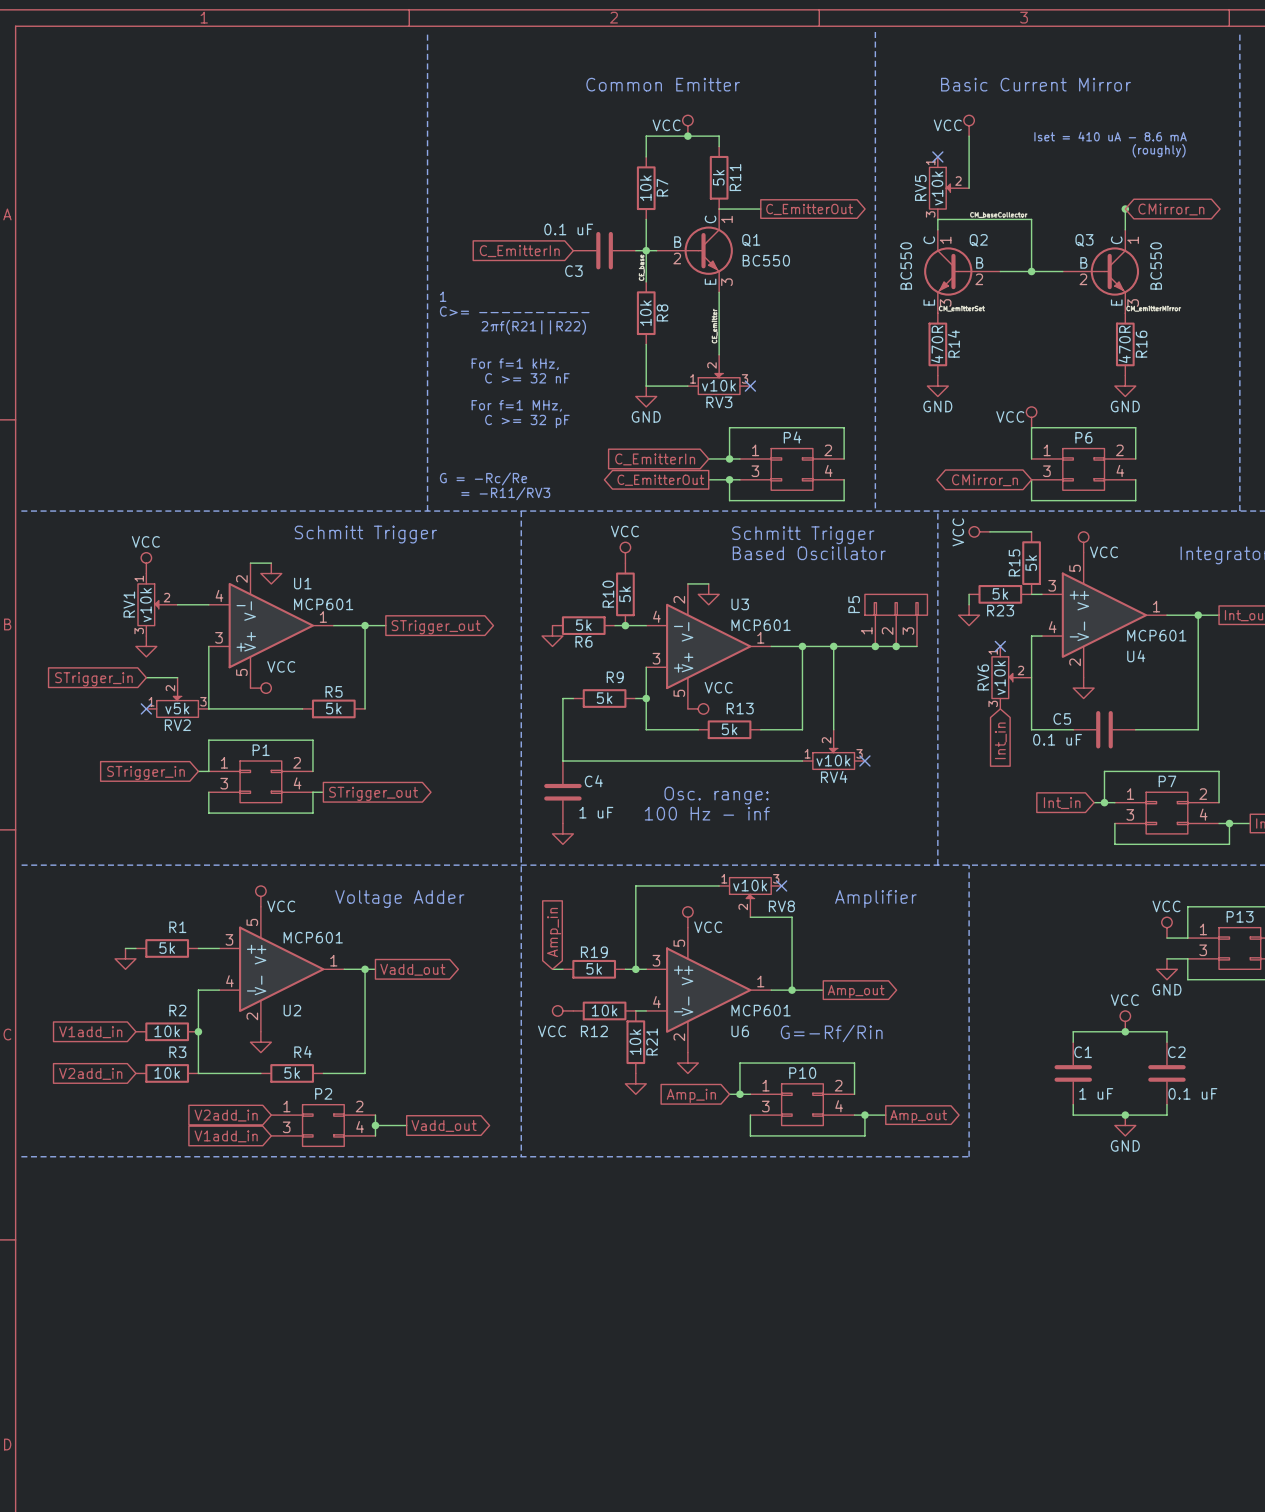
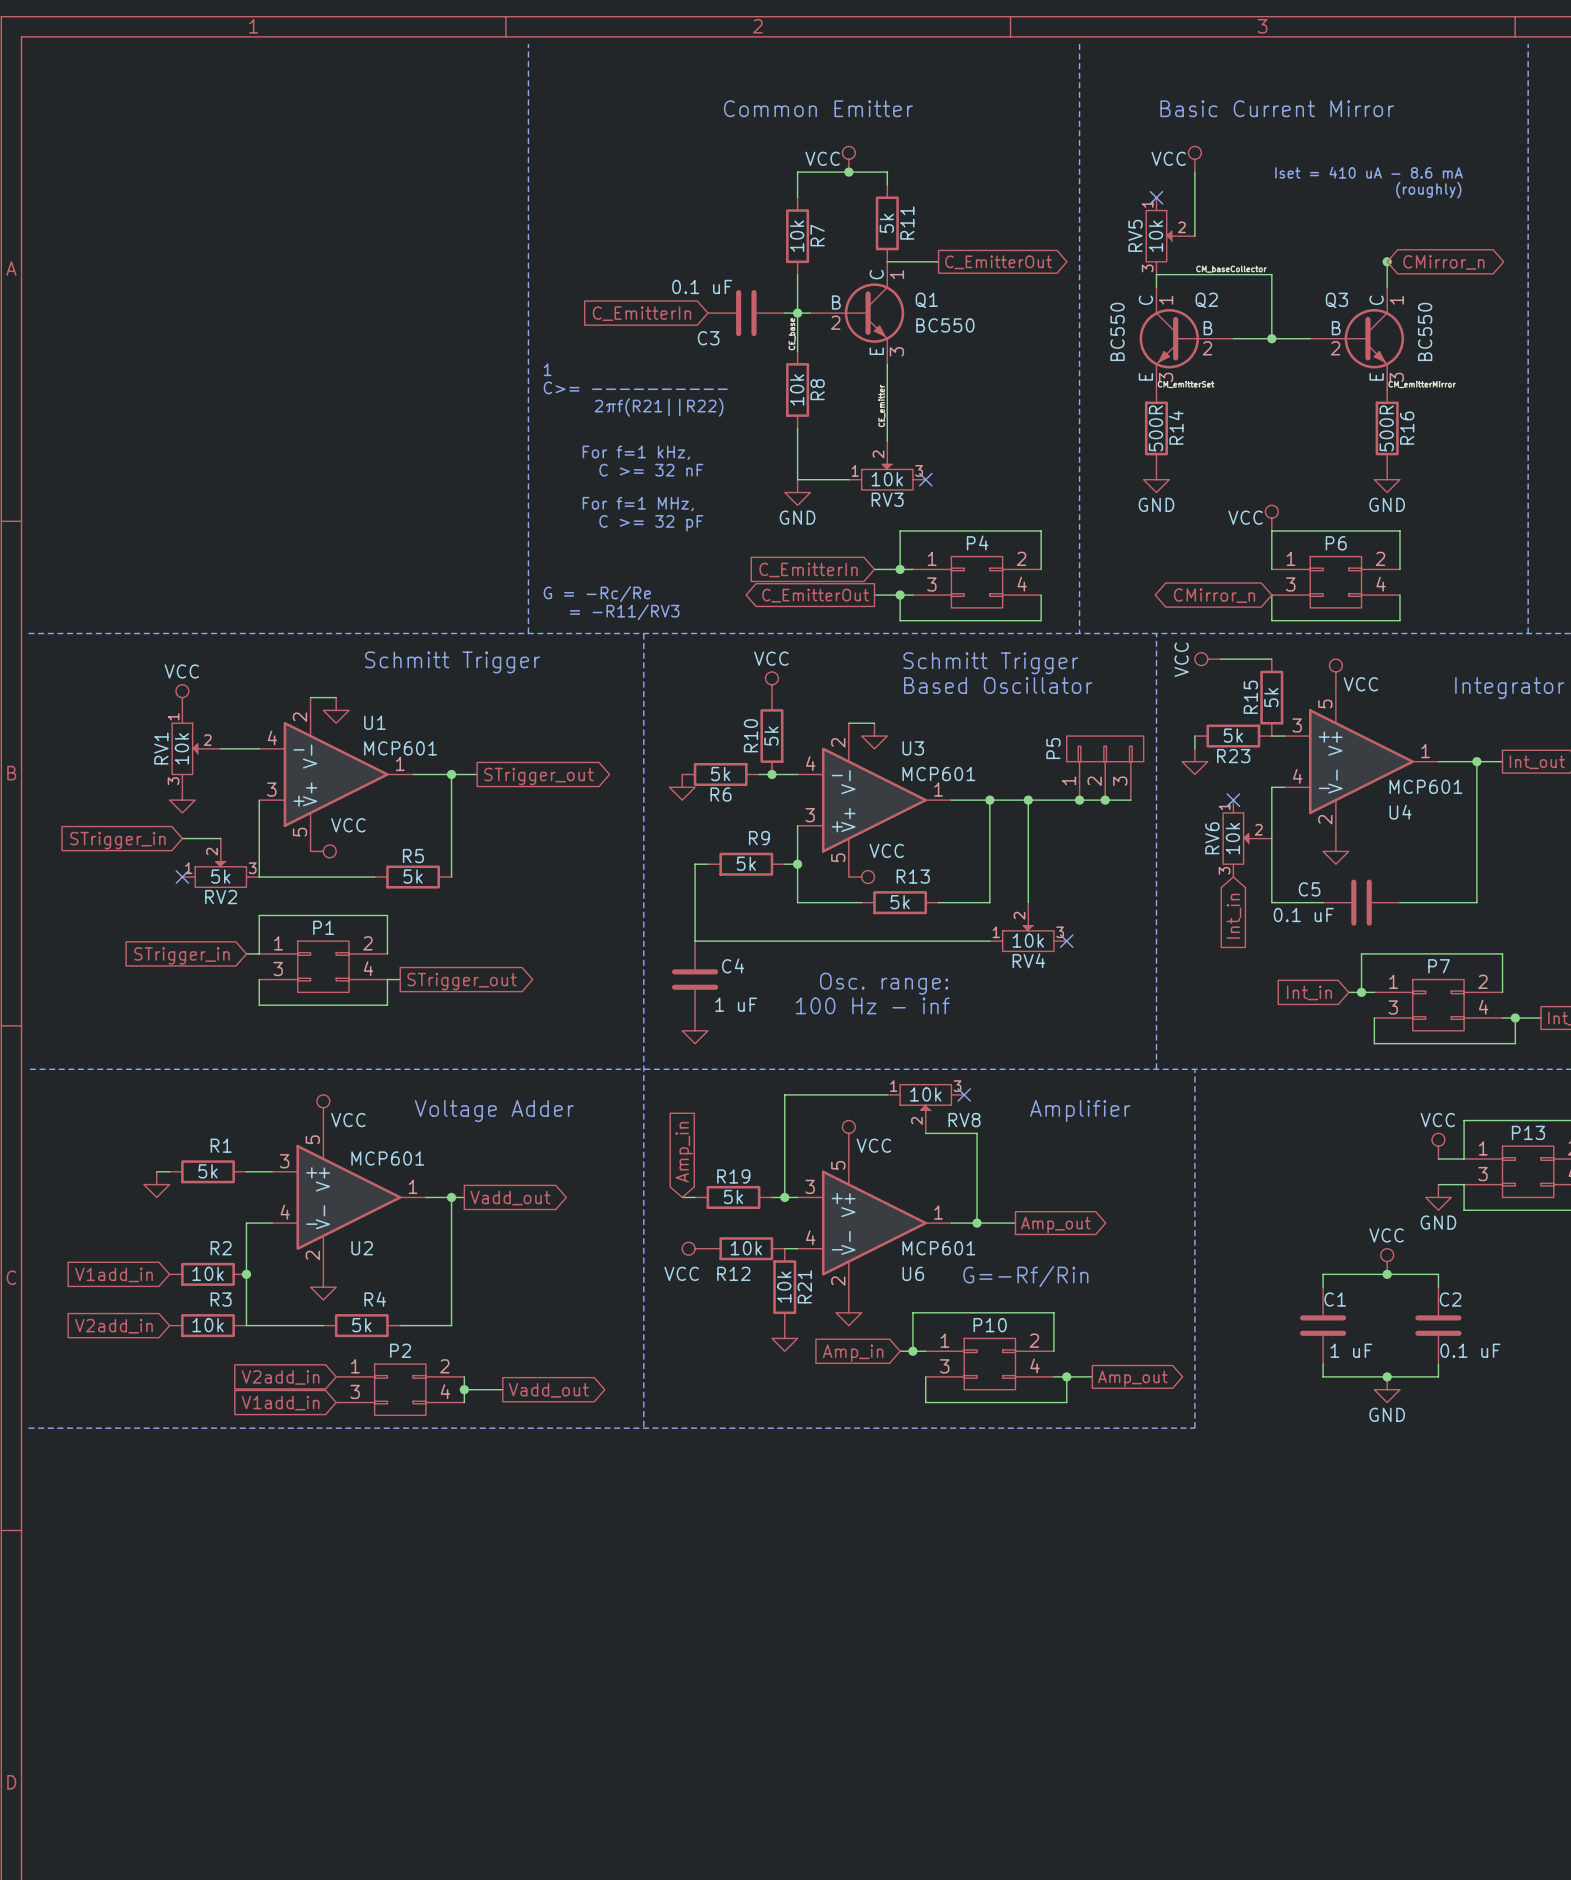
RV5 value: v10k (937, 188) -> 10k (1155, 236)
R14 value: 470R (937, 344) -> 500R (1155, 428)
R16 value: 470R (1124, 344) -> 500R (1386, 428)
RV3 value: v10k (718, 385) -> 10k (887, 479)
RV1 value: v10k (145, 605) -> 10k (181, 748)
RV6 value: v10k (999, 677) -> 10k (1232, 838)
RV2 value: v5k (177, 708) -> 5k (220, 876)
RV4 value: v10k (833, 760) -> 10k (1028, 940)
RV8 value: v10k (750, 885) -> 10k (925, 1094)

